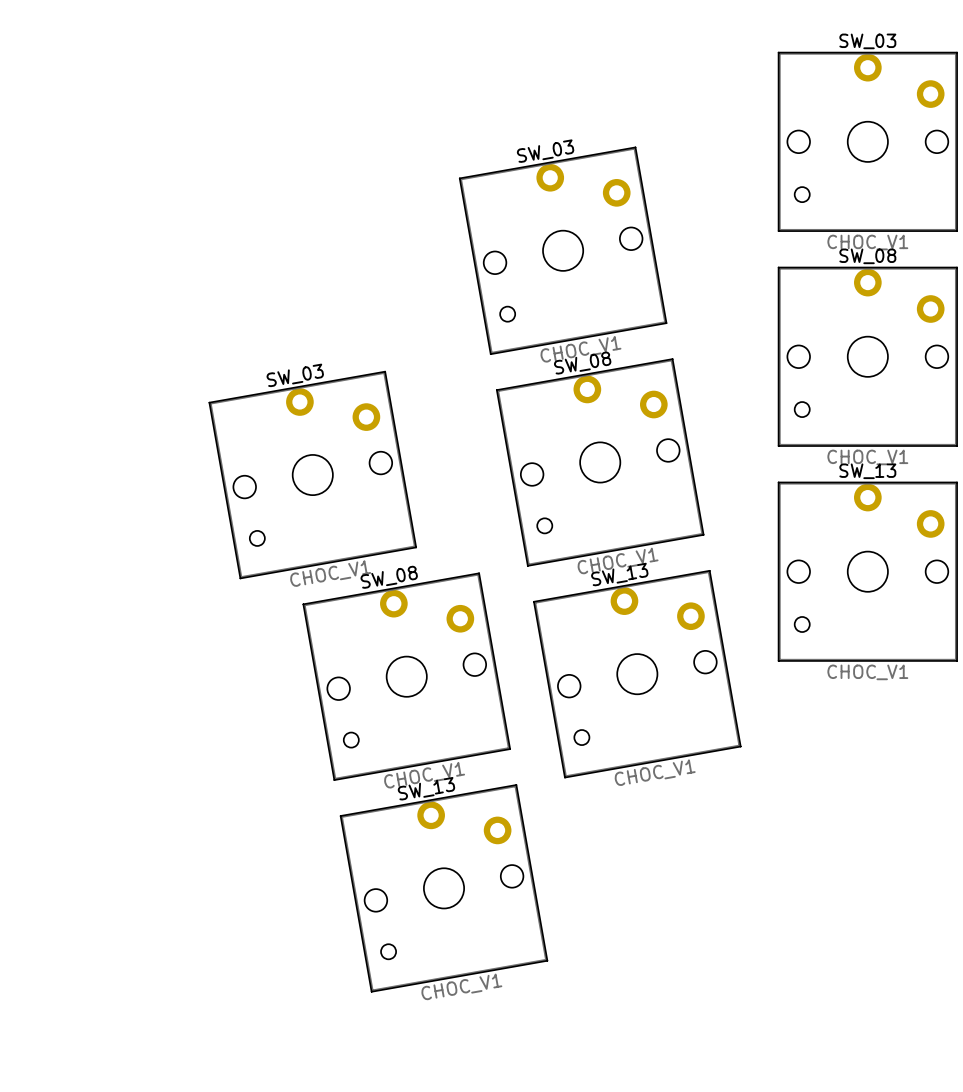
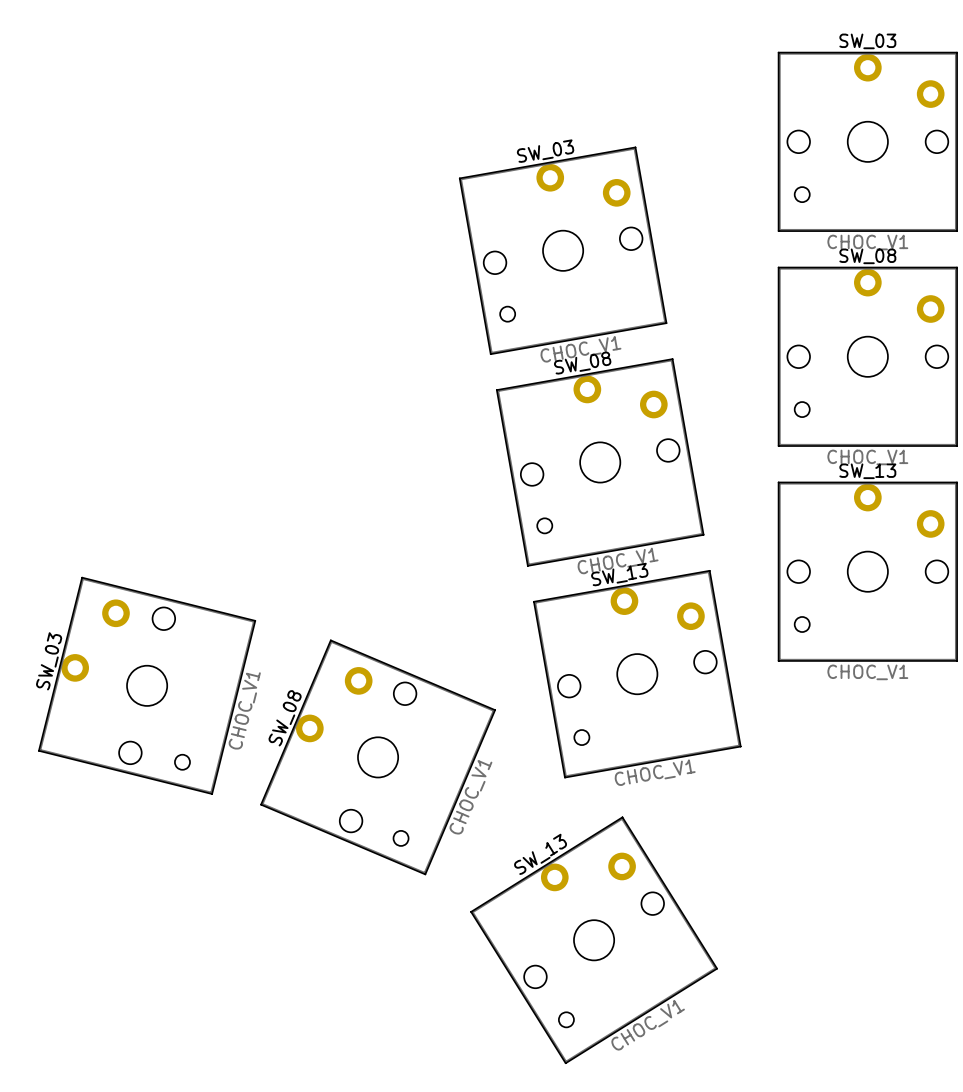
SW_03: CHOC_V1 (312, 475) -> none
SW_08: CHOC_V1 (406, 676) -> none
SW_03: none -> CHOC_V1 (147, 685)
SW_08: none -> CHOC_V1 (378, 757)
SW_13: CHOC_V1 (444, 888) -> none
SW_13: none -> CHOC_V1 (594, 940)

